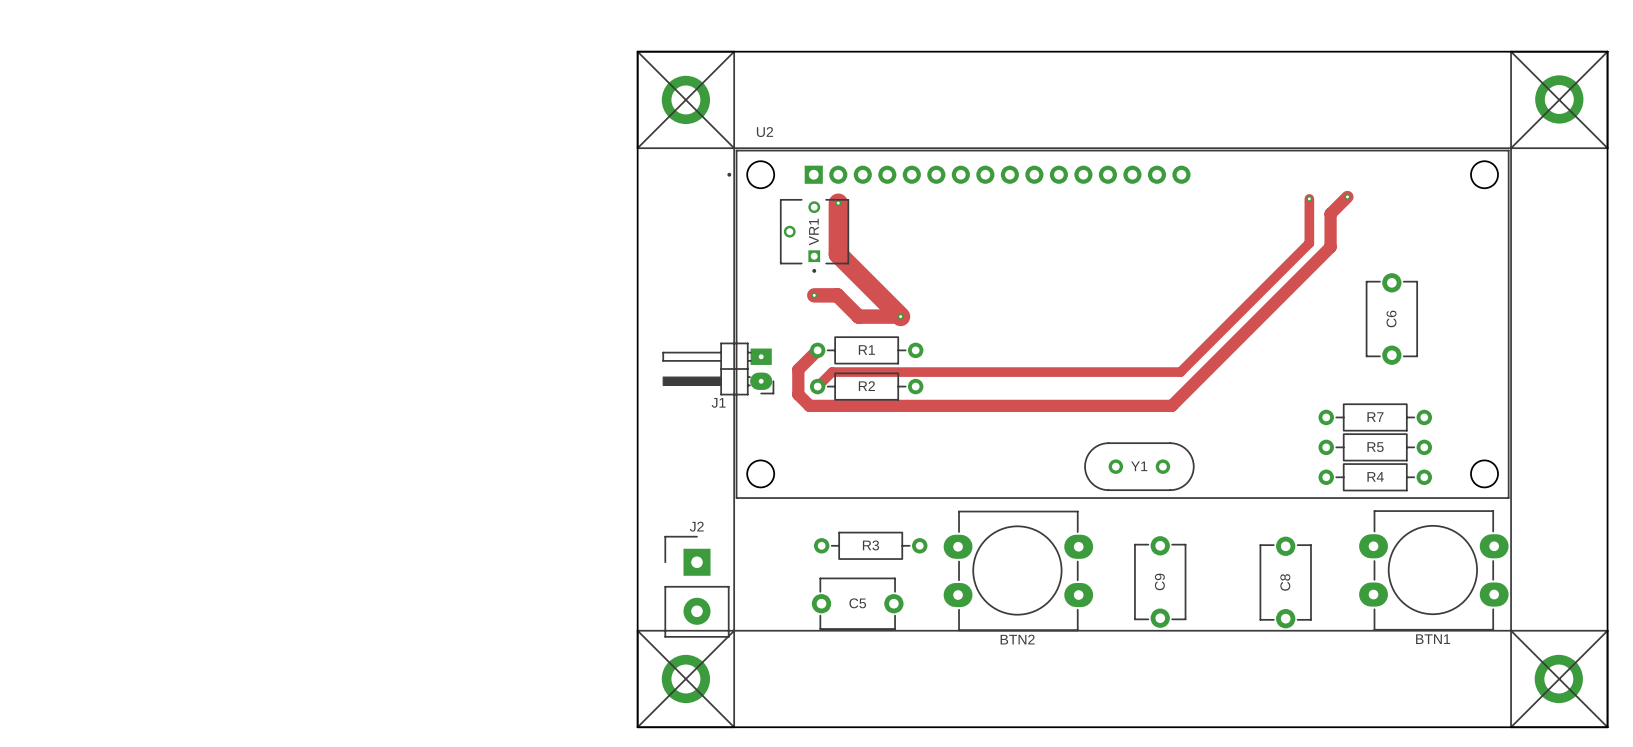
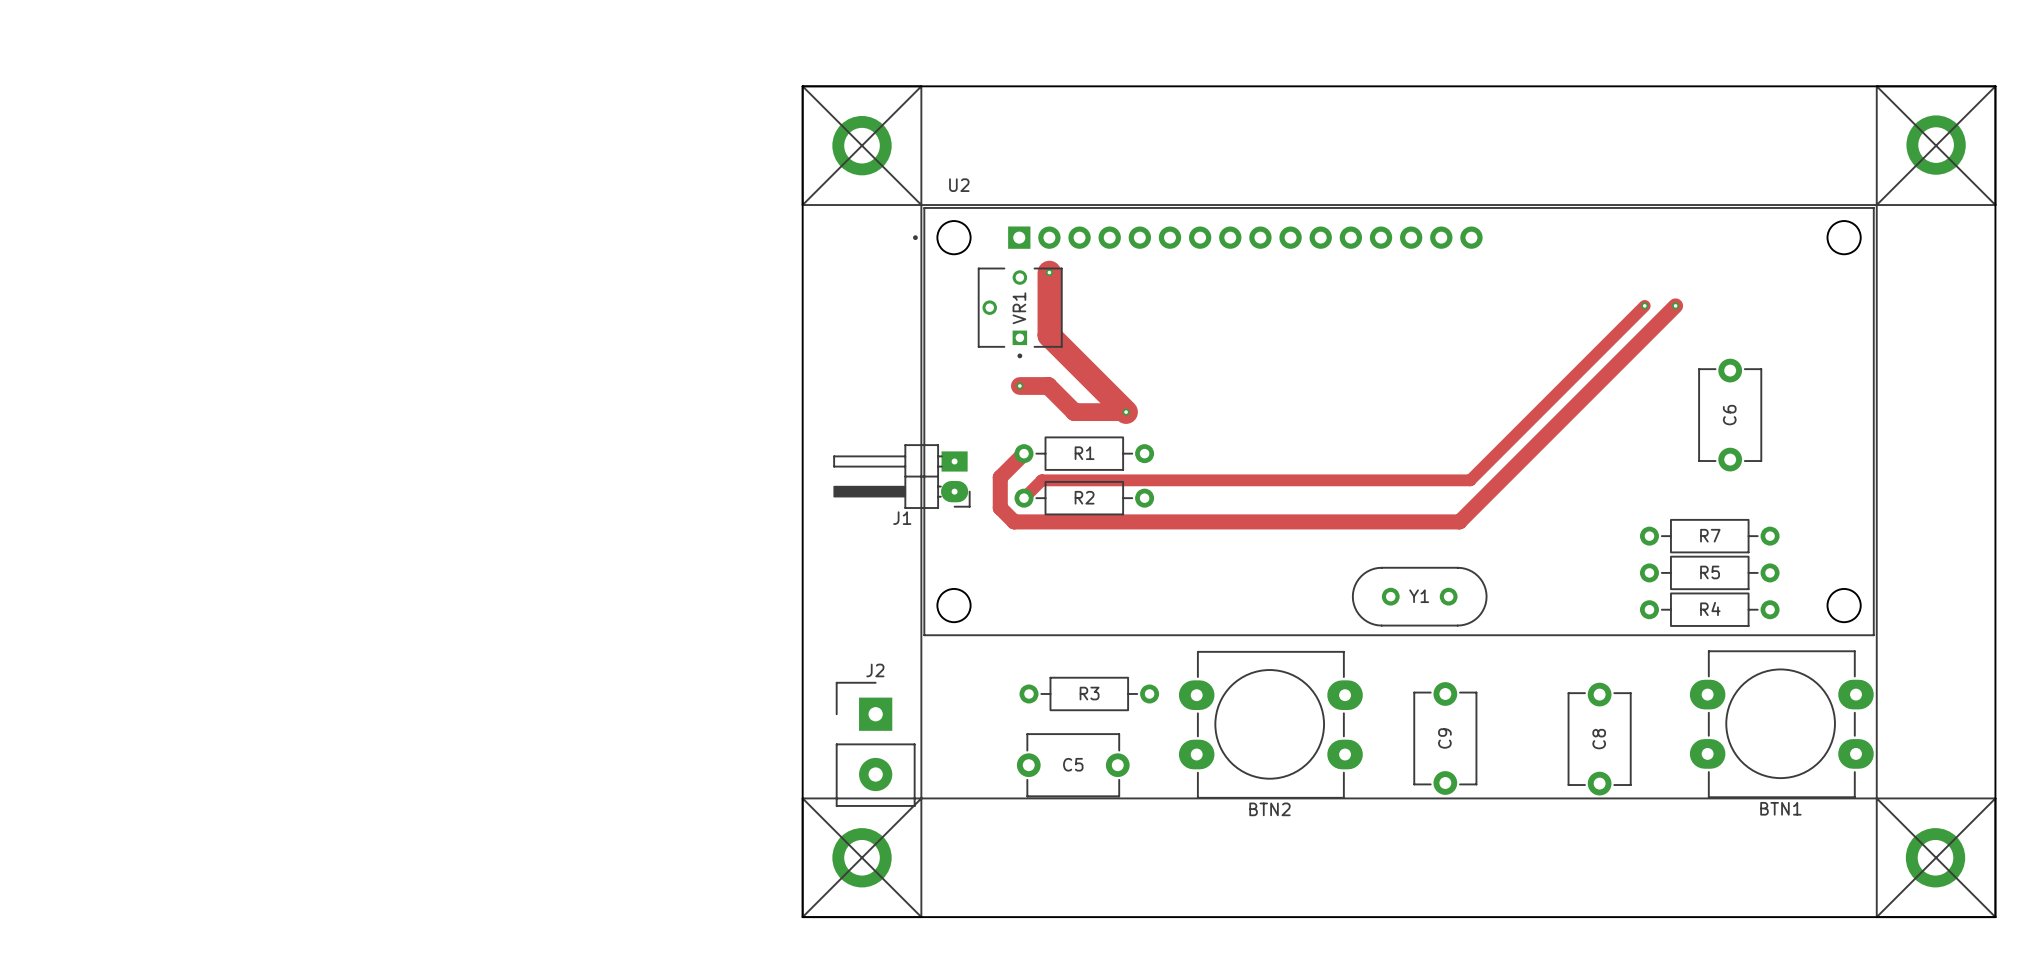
track: (1347, 196) (1330, 213) (1330, 247) -> (1675, 305) (1654, 326)
via: (1347, 196) -> none
track: (1309, 198) (1309, 243) -> (1644, 305) (1628, 321)
via: (1309, 198) -> none
via: none -> (1644, 305)
via: none -> (1675, 305)

